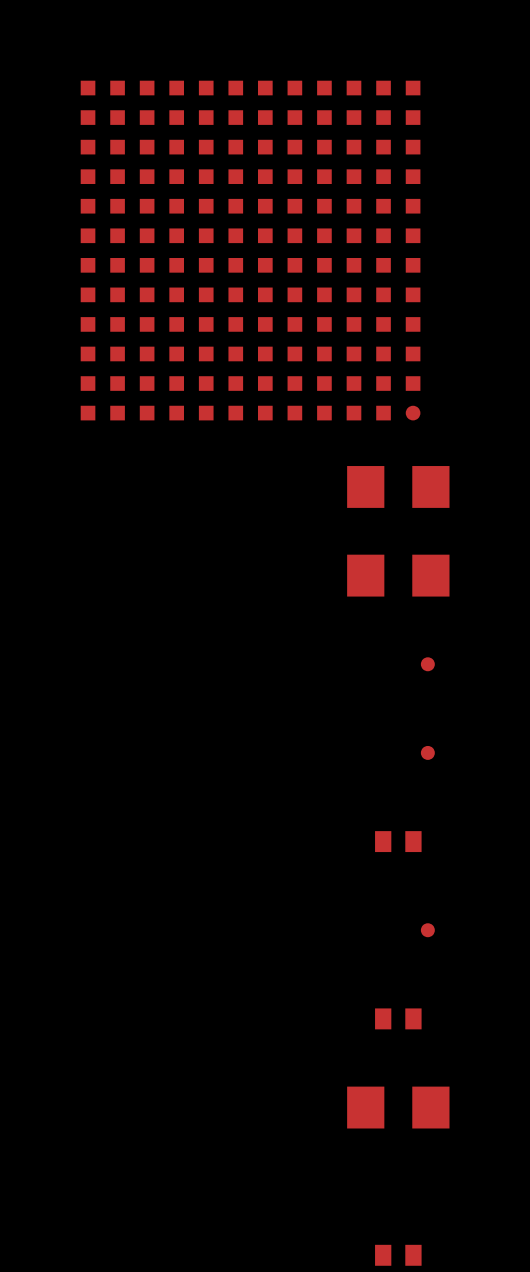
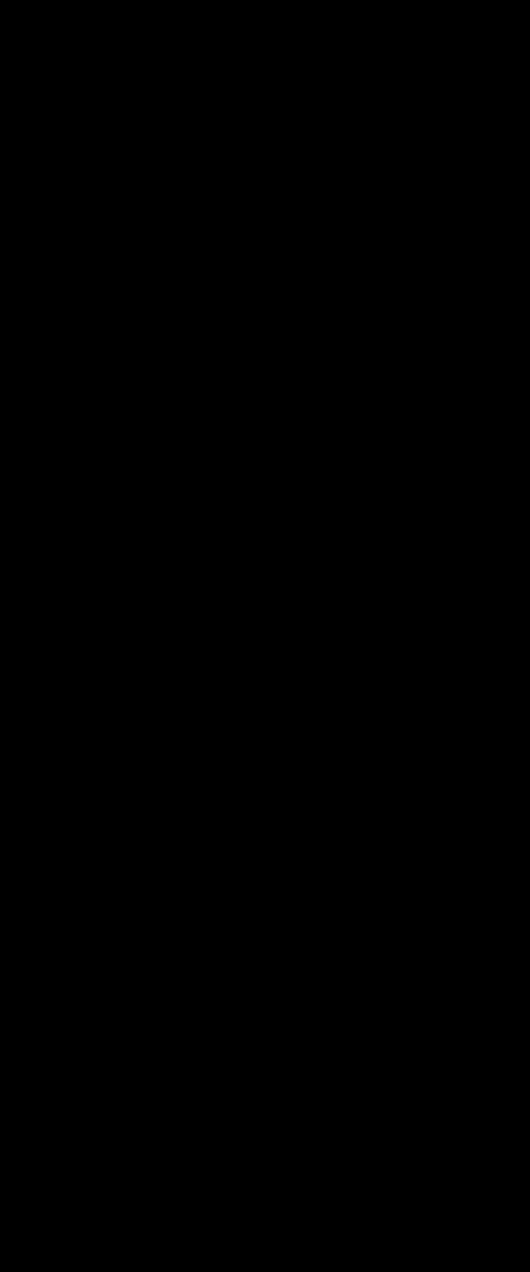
part: (250, 250) -> none
part: (398, 486) -> none
part: (398, 575) -> none
part: (427, 664) -> none
part: (427, 752) -> none
part: (398, 841) -> none
part: (427, 930) -> none
part: (398, 1018) -> none
part: (398, 1107) -> none
part: (398, 1255) -> none

